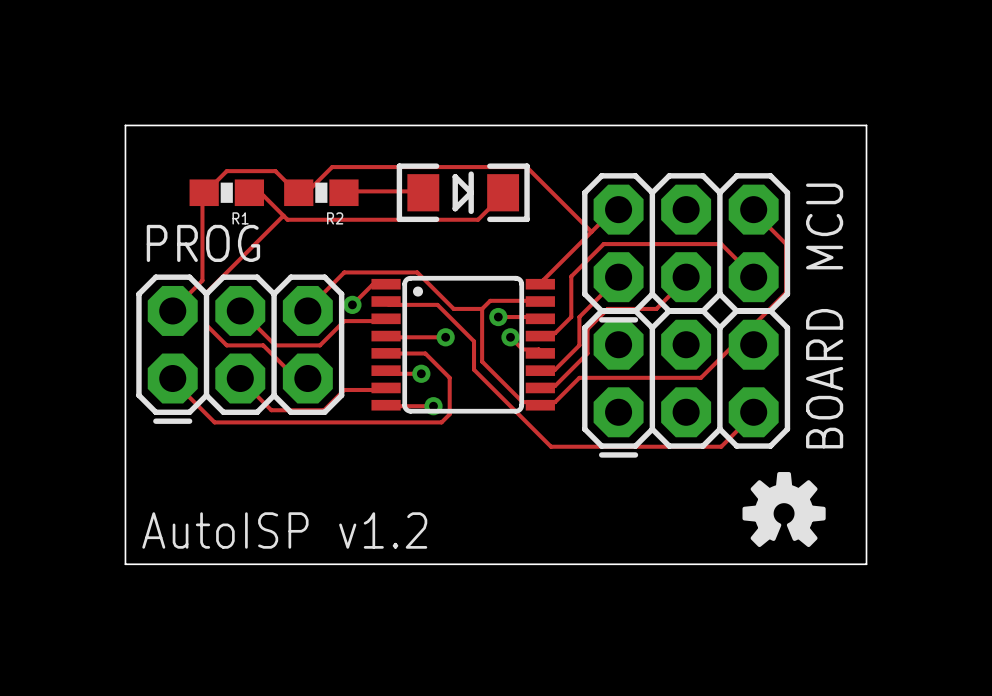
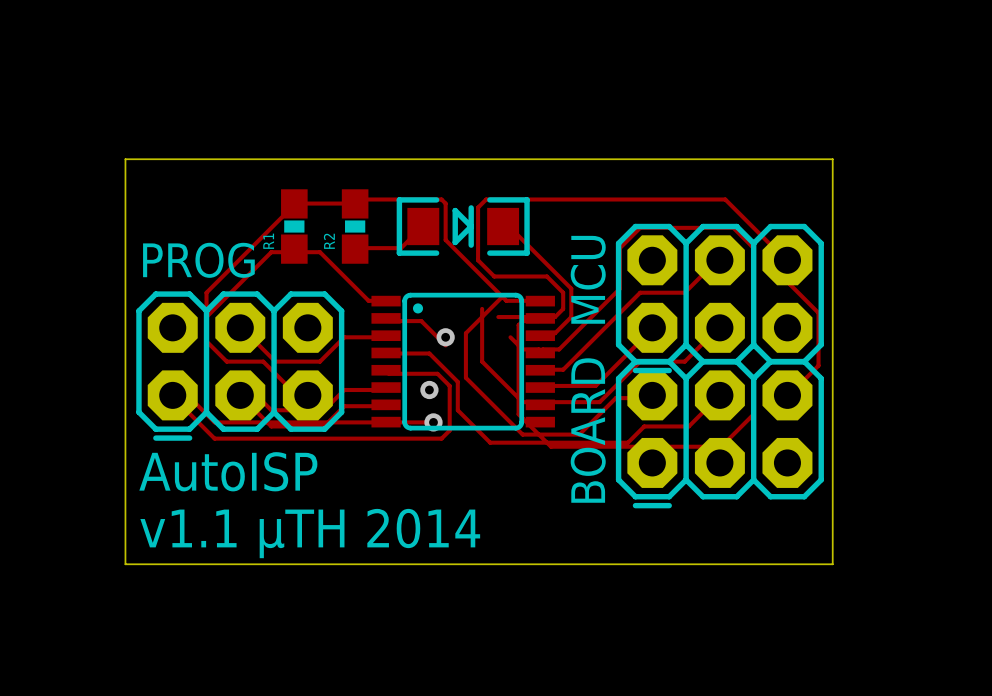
board edge: (125, 159) (125, 125) (866, 125) (866, 564) (832, 564) -> (125, 159) (832, 159) (832, 564)
R1 rotation: 0° (226, 192) -> 90° clockwise (294, 226)
R1 position: (226, 192) -> (294, 226)
track: (249, 192) (251, 195) (263, 195) (287, 219) (478, 219) (503, 192) -> none
R2 rotation: 0° (321, 192) -> 90° clockwise (355, 226)
R2 position: (321, 192) -> (355, 226)
track: (343, 192) (423, 192) -> none
part position: (463, 192) -> (463, 226)
track: (618, 209) (615, 207) (540, 284) -> none
track: (753, 209) (786, 244) (786, 292) (753, 325) (753, 345) (733, 345) (700, 377) (579, 377) (555, 402) -> (719, 327) (684, 361) (640, 361) (599, 402) (555, 402)
track: none -> (423, 226) (401, 248) (355, 249)
track: none -> (503, 226) (506, 223) (571, 288)
MCU name position: MCU (824, 226) -> MCU (588, 279)
track: (591, 231) (526, 167) (332, 167) (307, 191) (298, 192) (275, 171) (226, 171) (202, 195) (202, 280) (172, 310) -> none
MCU position: (686, 247) -> (719, 298)
track: (753, 276) (721, 244) (603, 244) (571, 276) (571, 288) -> (753, 276) (753, 248) (733, 227) (640, 227) (619, 248) (619, 288) (559, 349) (542, 349) (540, 352)
track: (618, 277) (579, 317) (579, 345) (555, 369) -> (719, 260) (717, 260) (684, 292) (640, 292) (563, 369) (555, 369)
track: (686, 277) (656, 308) (607, 308) (587, 329) (587, 353) (555, 385) -> (652, 327) (595, 385) (555, 385)
track: (386, 284) (372, 284) (352, 304) -> none
track: none -> (502, 296) (465, 333) (465, 377) (522, 434) (579, 434) (615, 398) (652, 398) (652, 395)
track: (506, 300) (490, 300) (482, 308) (453, 308) (417, 272) (344, 272) (307, 310) -> (506, 300) (445, 240) (445, 203) (441, 199) (360, 199) (355, 203) (295, 203) (283, 215)
track: (386, 301) (388, 304) (437, 304) (474, 341) (474, 369) (518, 414) -> (386, 301) (368, 300) (320, 252) (295, 252) (294, 249) (291, 252) (271, 252) (206, 317)
via: (352, 304) -> none
track: (240, 310) (275, 345) (320, 345) (344, 321) (384, 321) (386, 318) -> (445, 345) (421, 321) (388, 321) (386, 318)
via: (498, 317) -> none
track: (206, 325) (226, 345) (263, 345) (295, 377) (307, 378) -> (206, 325) (206, 341) (226, 361) (263, 361) (295, 394) (307, 395)
track: (386, 336) (445, 337) -> (386, 335) (384, 337) (344, 337) (320, 361) (275, 361) (240, 327)
via: (510, 337) -> none
part position: (463, 344) -> (463, 361)
PROG position: (240, 349) -> (240, 366)
track: (425, 353) (449, 377) (449, 385) -> (421, 373) (437, 373) (449, 385)
track: none -> (425, 353) (429, 353) (457, 381) (457, 410) (490, 442) (628, 442) (644, 426) (688, 426) (719, 395)
via: (421, 373) -> none
BOARD name position: BOARD (824, 378) -> BOARD (588, 430)
BOARD position: (686, 382) -> (719, 433)
via: none -> (429, 389)
track: none -> (787, 395) (818, 365) (818, 312) (790, 284) (790, 260) (786, 260) (725, 199) (486, 199) (478, 207) (478, 260) (494, 276) (546, 276) (563, 292) (563, 308) (555, 317) (542, 317) (538, 321) (522, 321) (518, 325) (518, 414)
track: (386, 405) (433, 406) -> (386, 404) (344, 406) (324, 426) (271, 426) (240, 395)
via: (433, 406) -> none
track: (449, 414) (441, 422) (433, 422) -> (449, 414) (449, 430) (441, 438) (214, 438) (172, 395)
via: none -> (433, 422)
text: none -> AutoISP (228, 471)
drawing: [742, 472, 826, 548] -> none
text: AutoISP v1.2 (284, 530) -> v1.1 µTH 2014 (310, 533)

